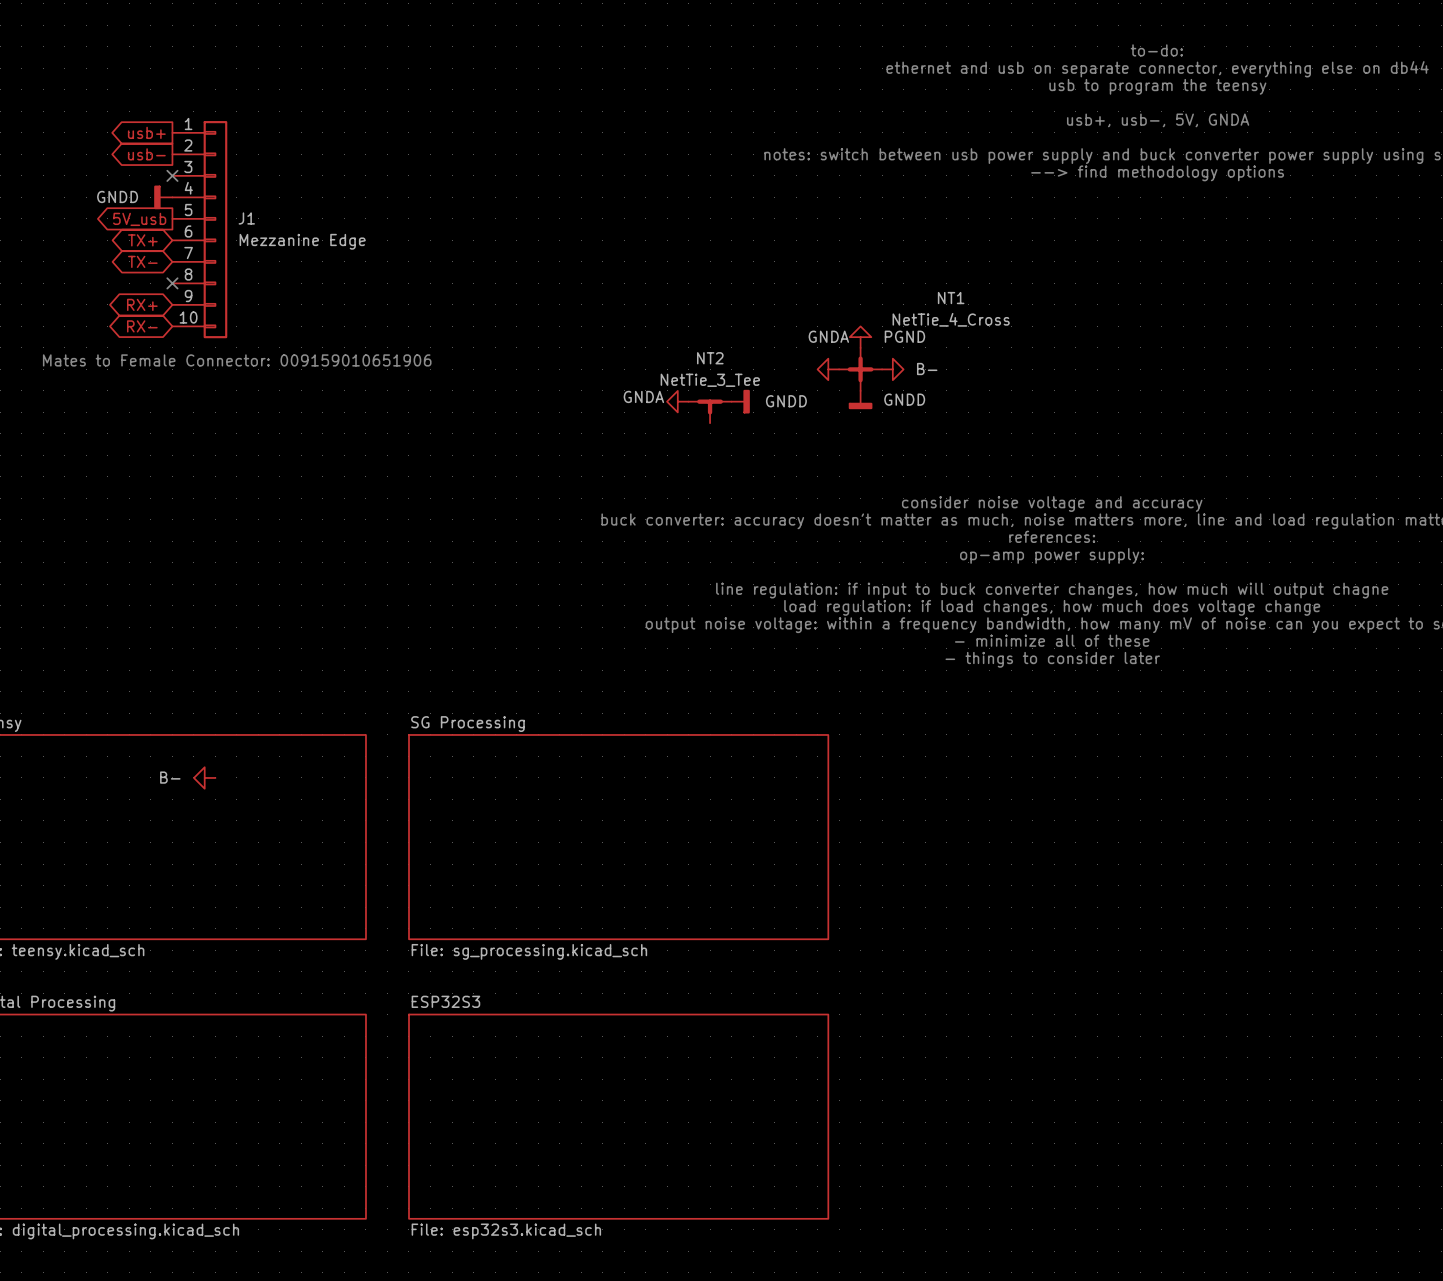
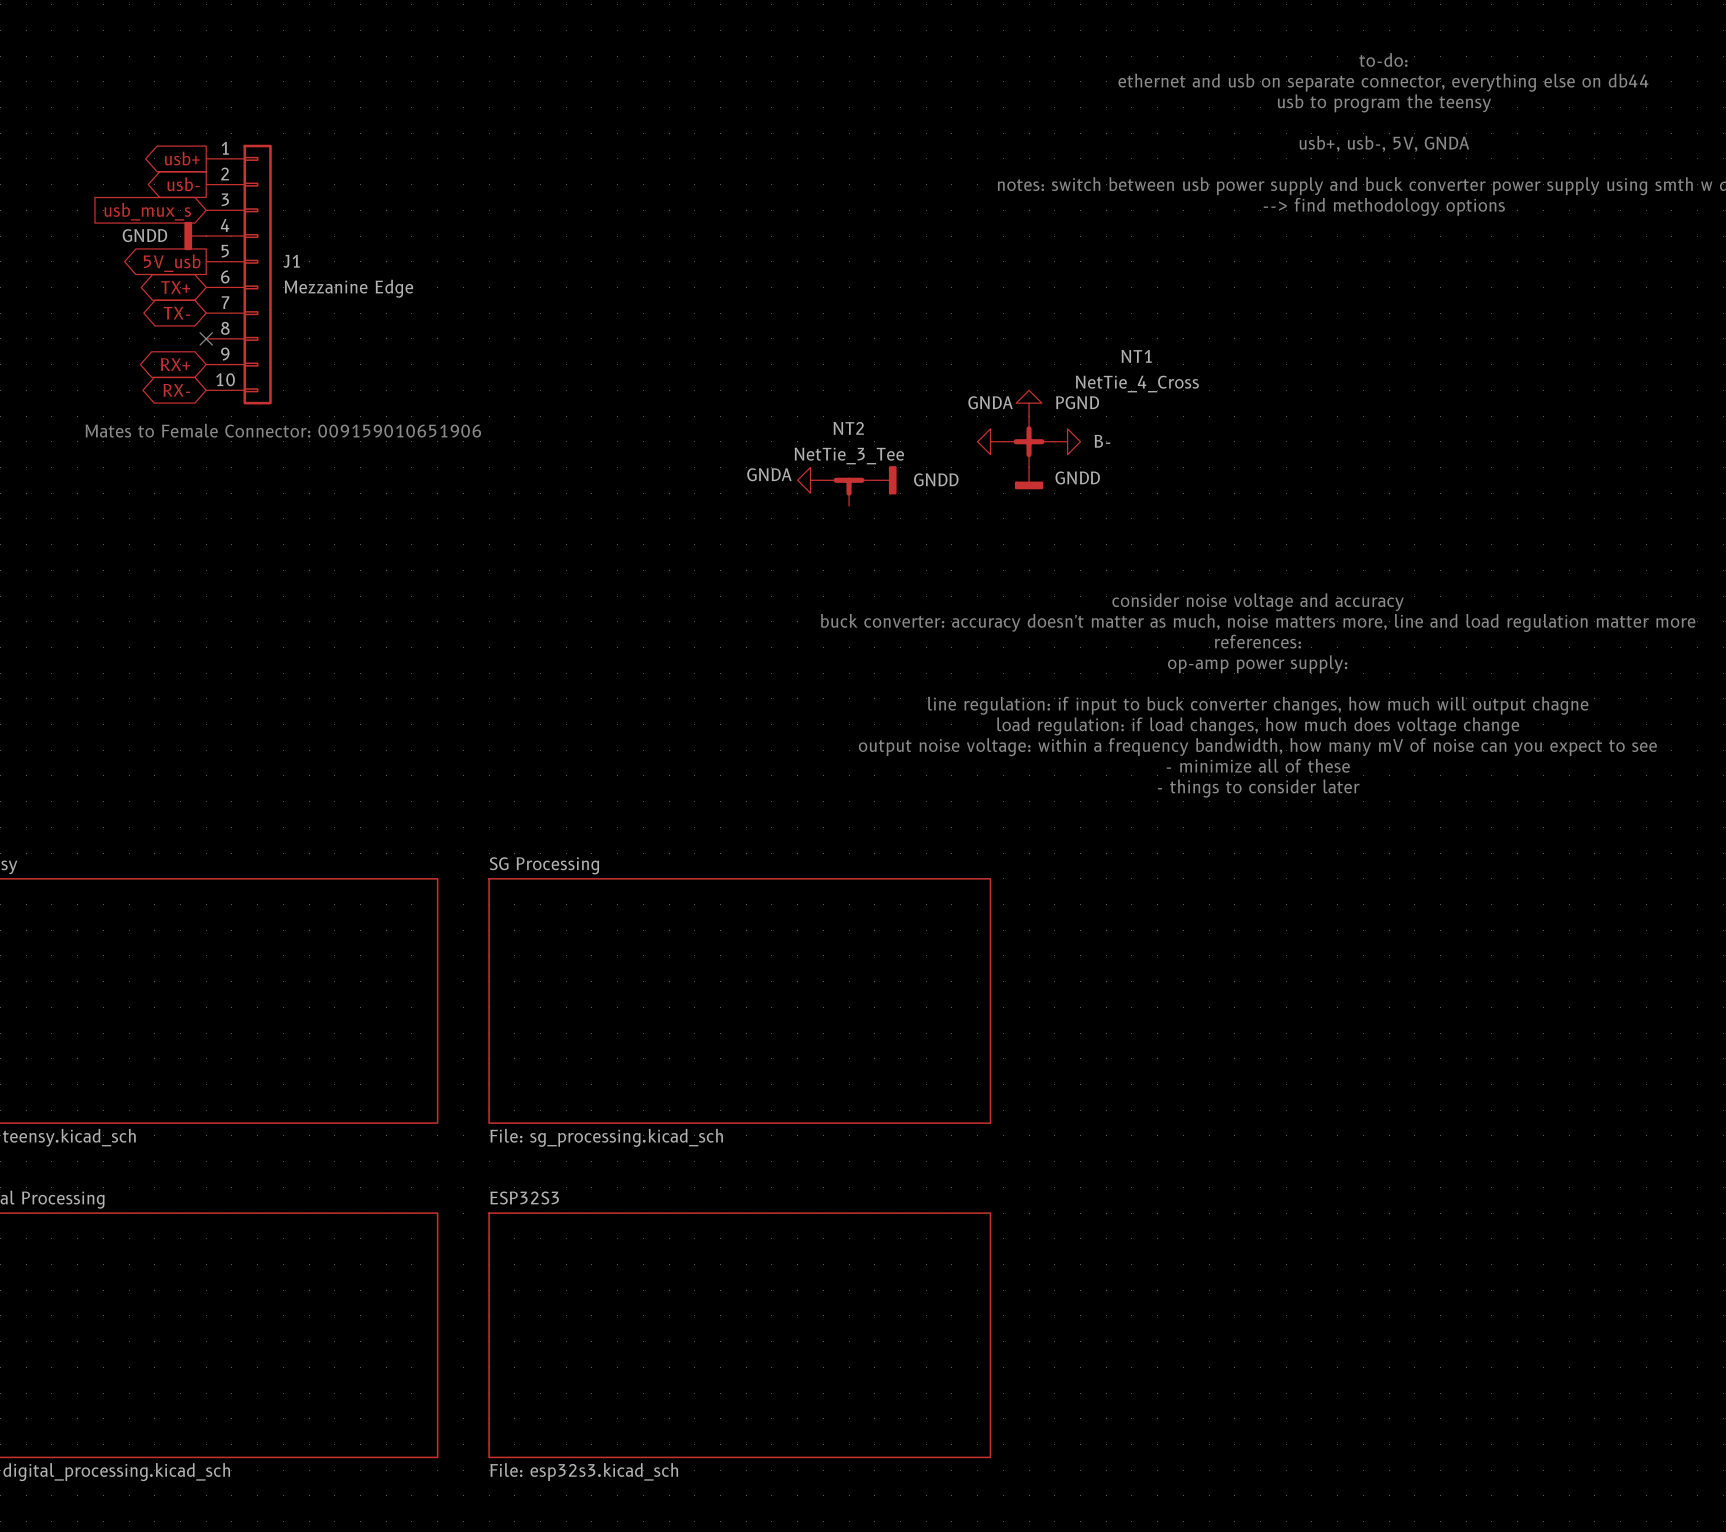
no-connect mark: (172, 175) -> none
global label: none -> usb_mux_s (147, 211)
power symbol: B- (204, 777) -> none

